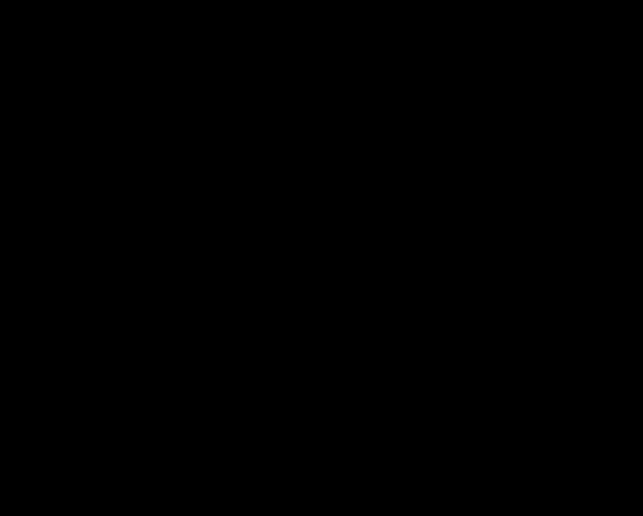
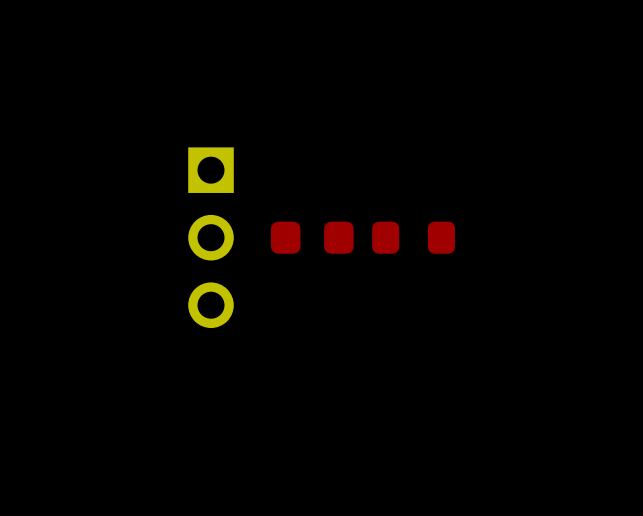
part: none -> (211, 237)
part: none -> (312, 237)
part: none -> (413, 237)

